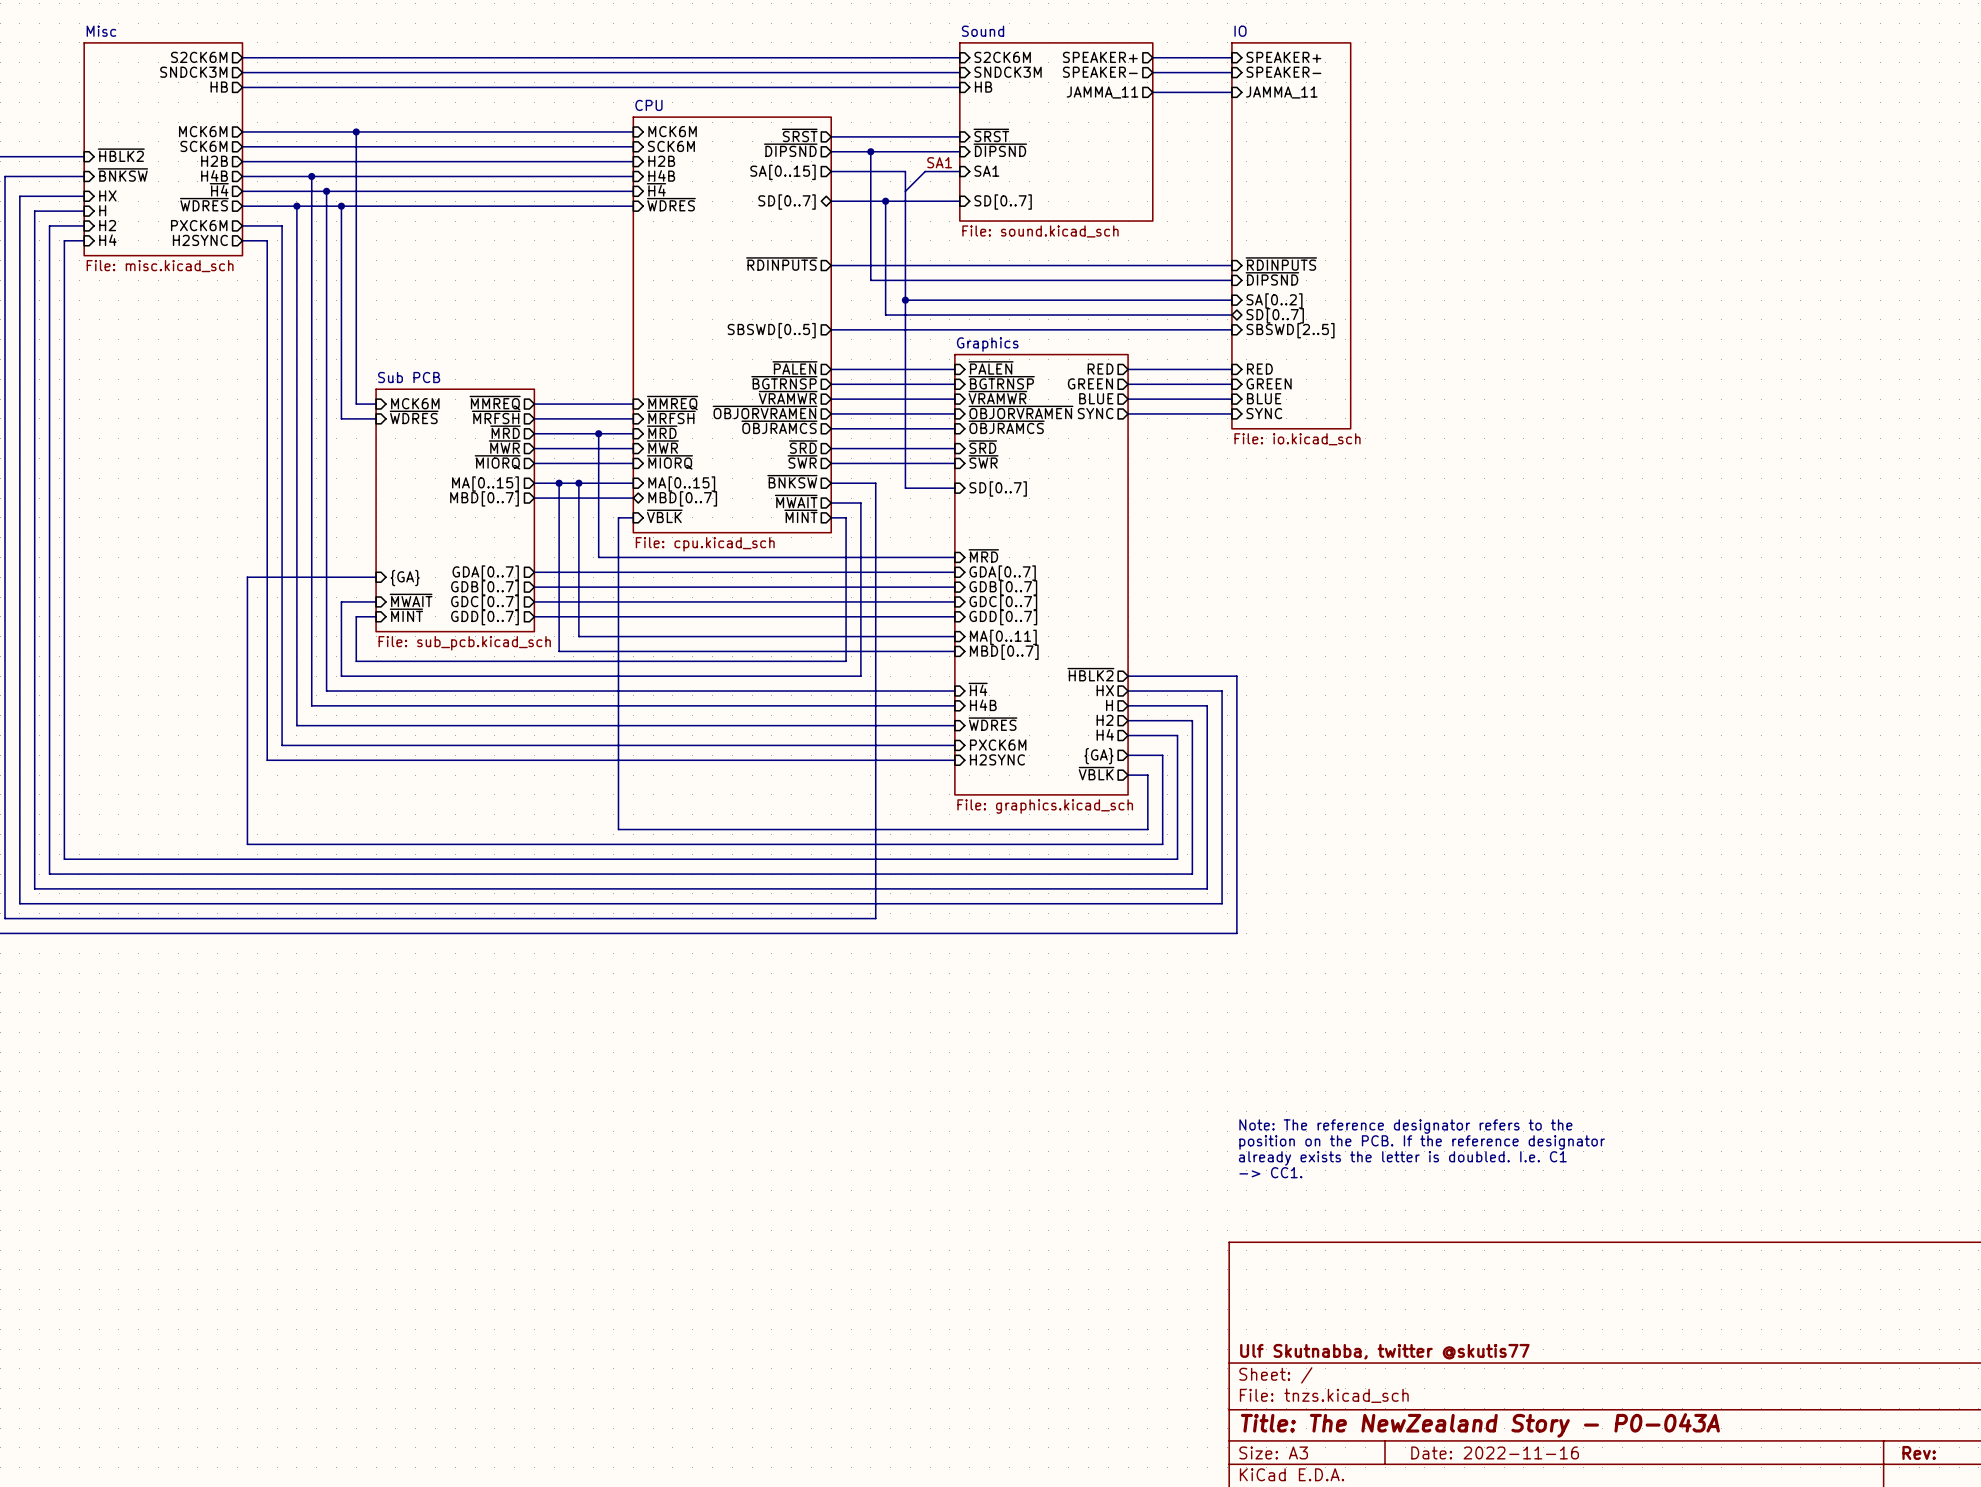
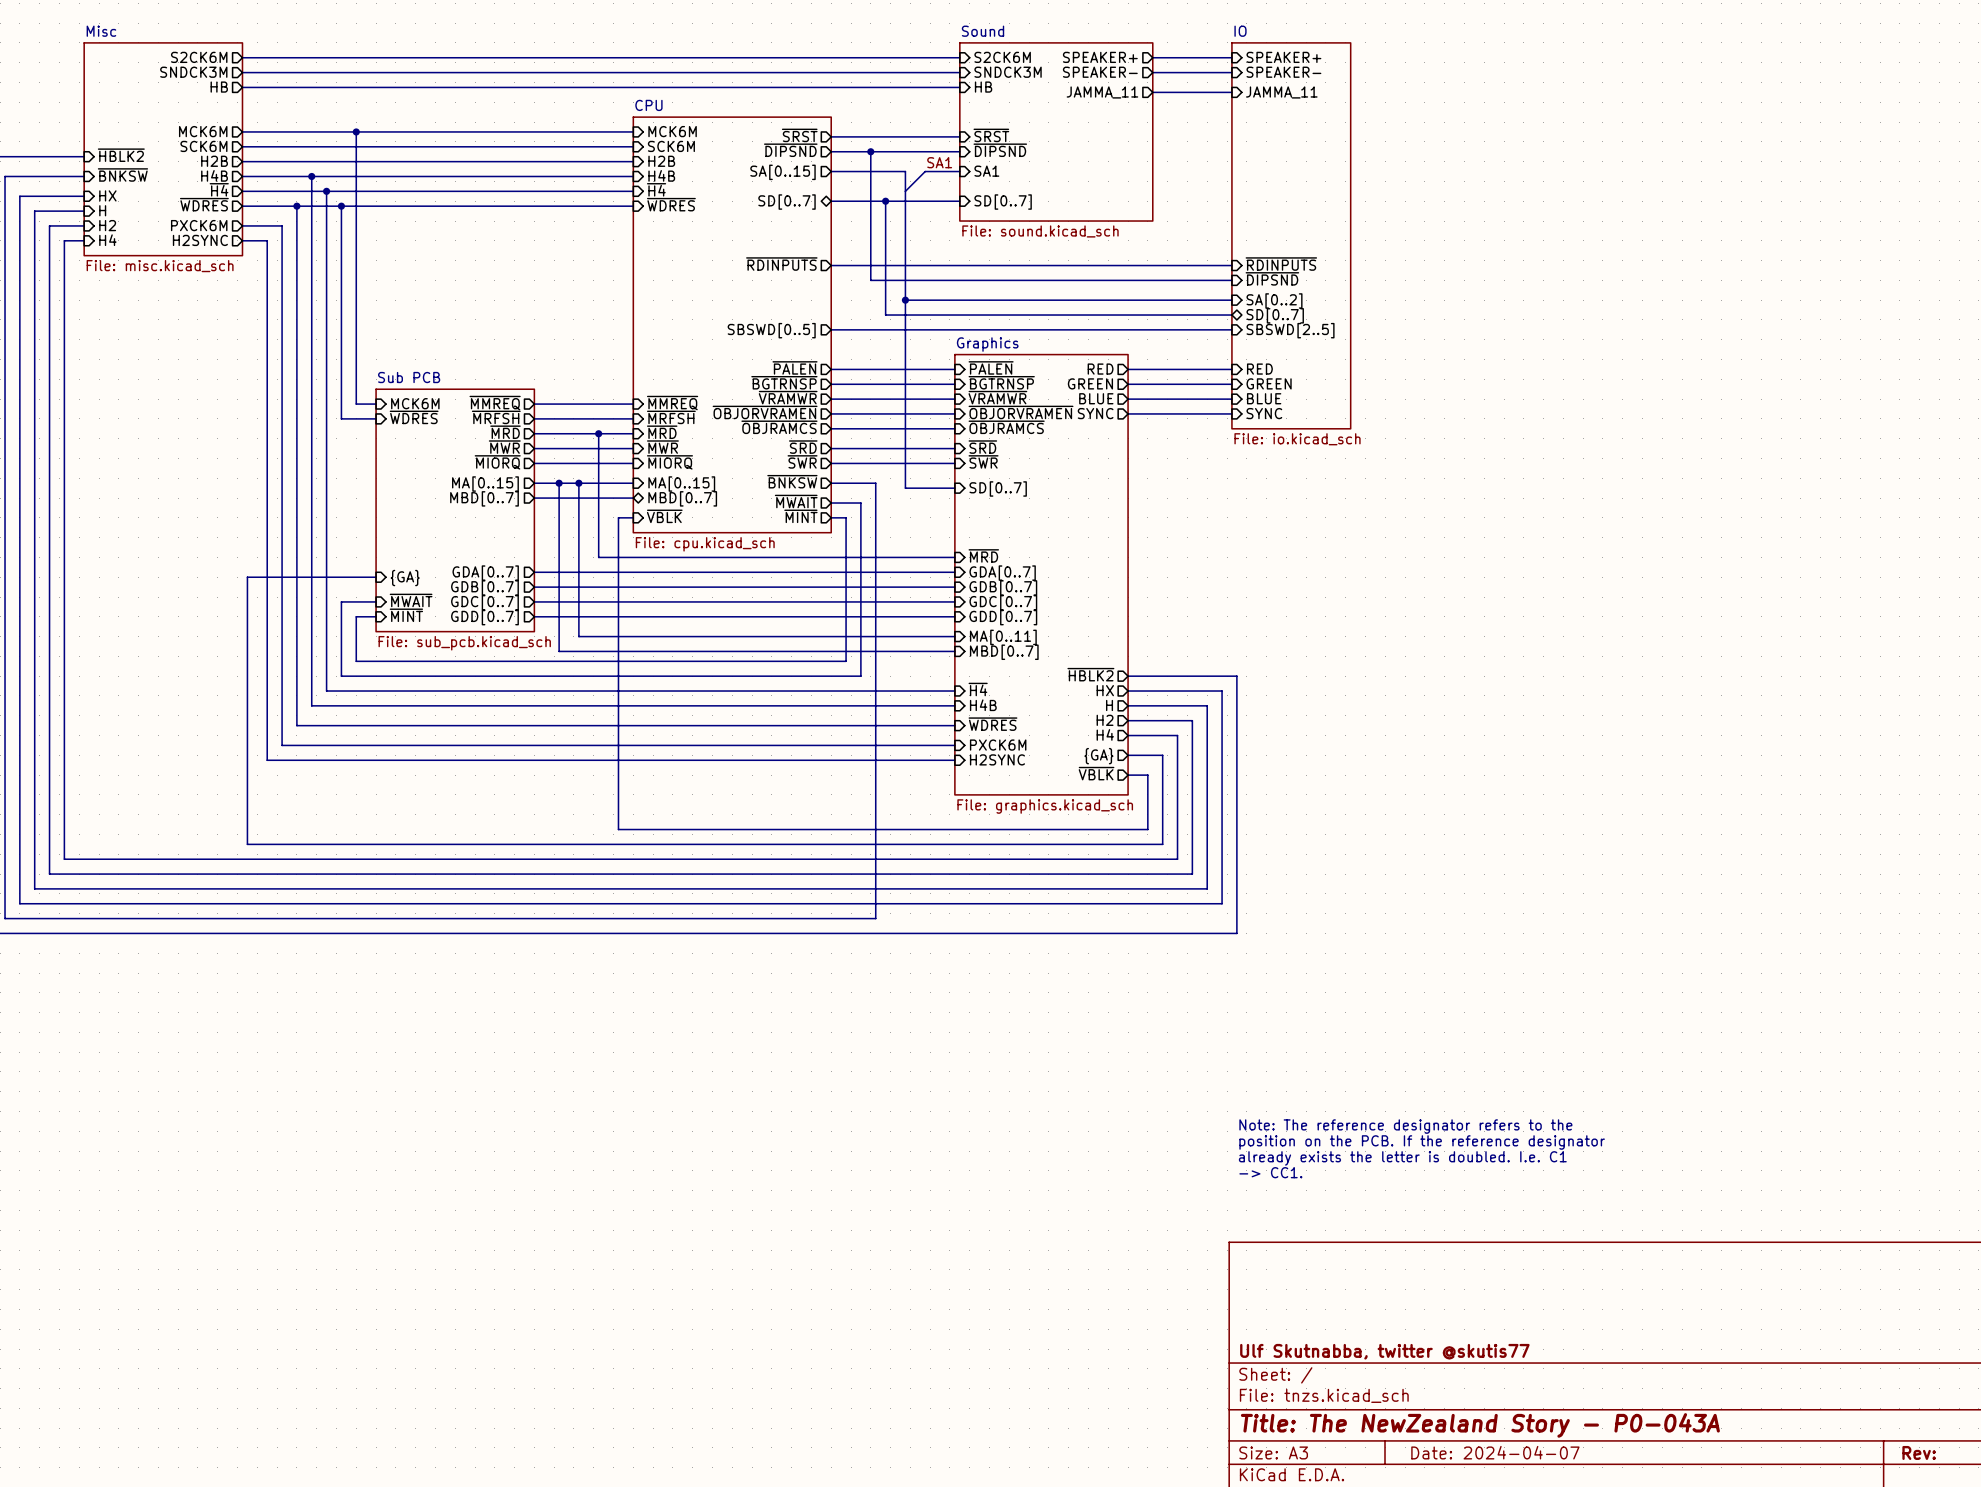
title block: Date: 2022-11-16 (1495, 1452) -> Date: 2024-04-07 (1495, 1452)

